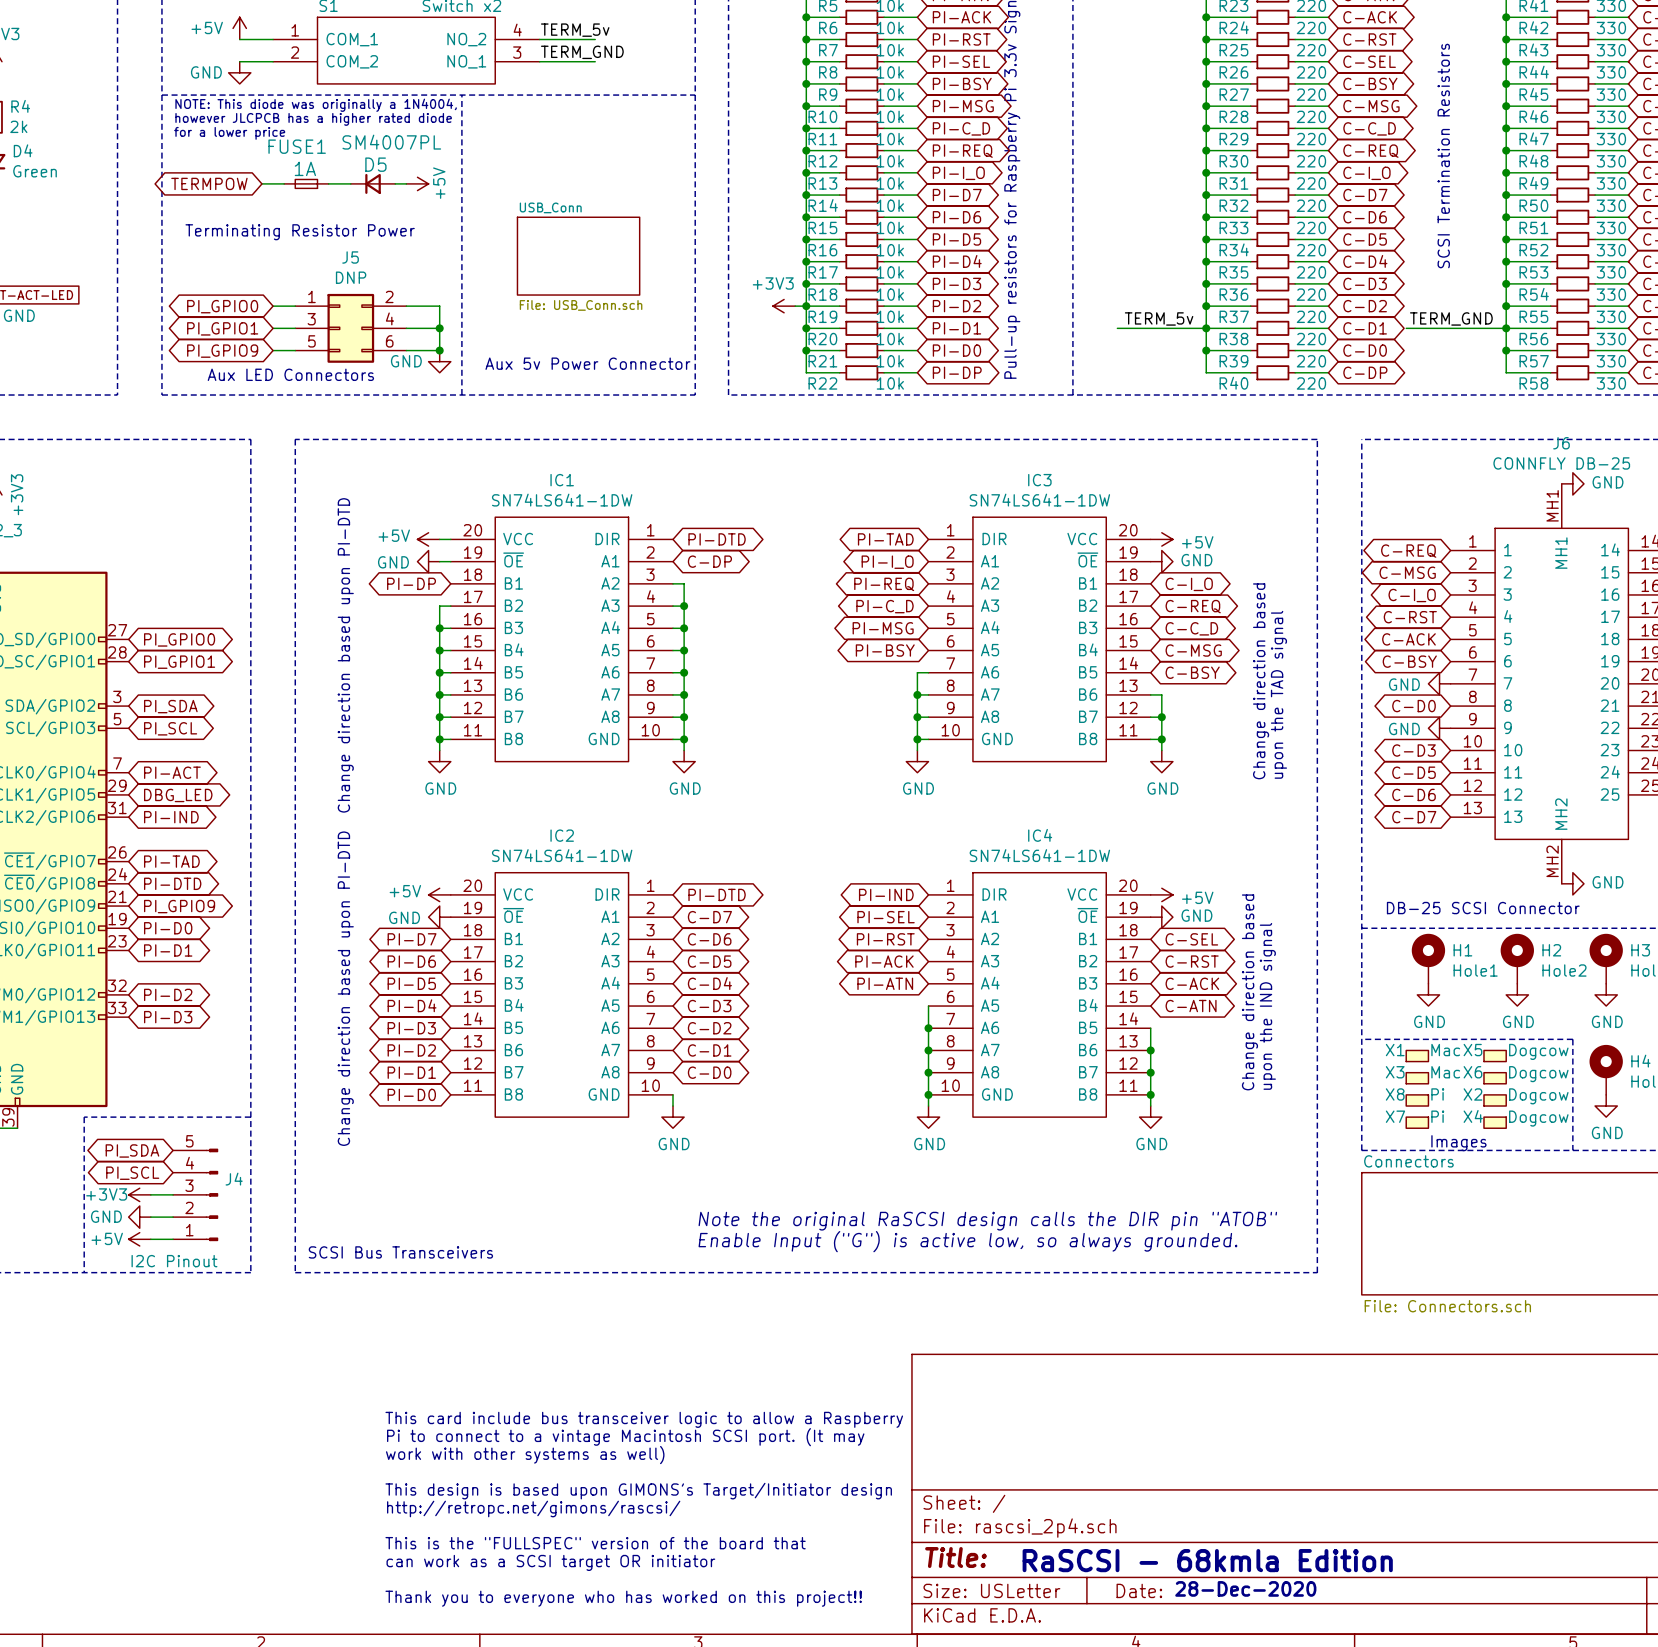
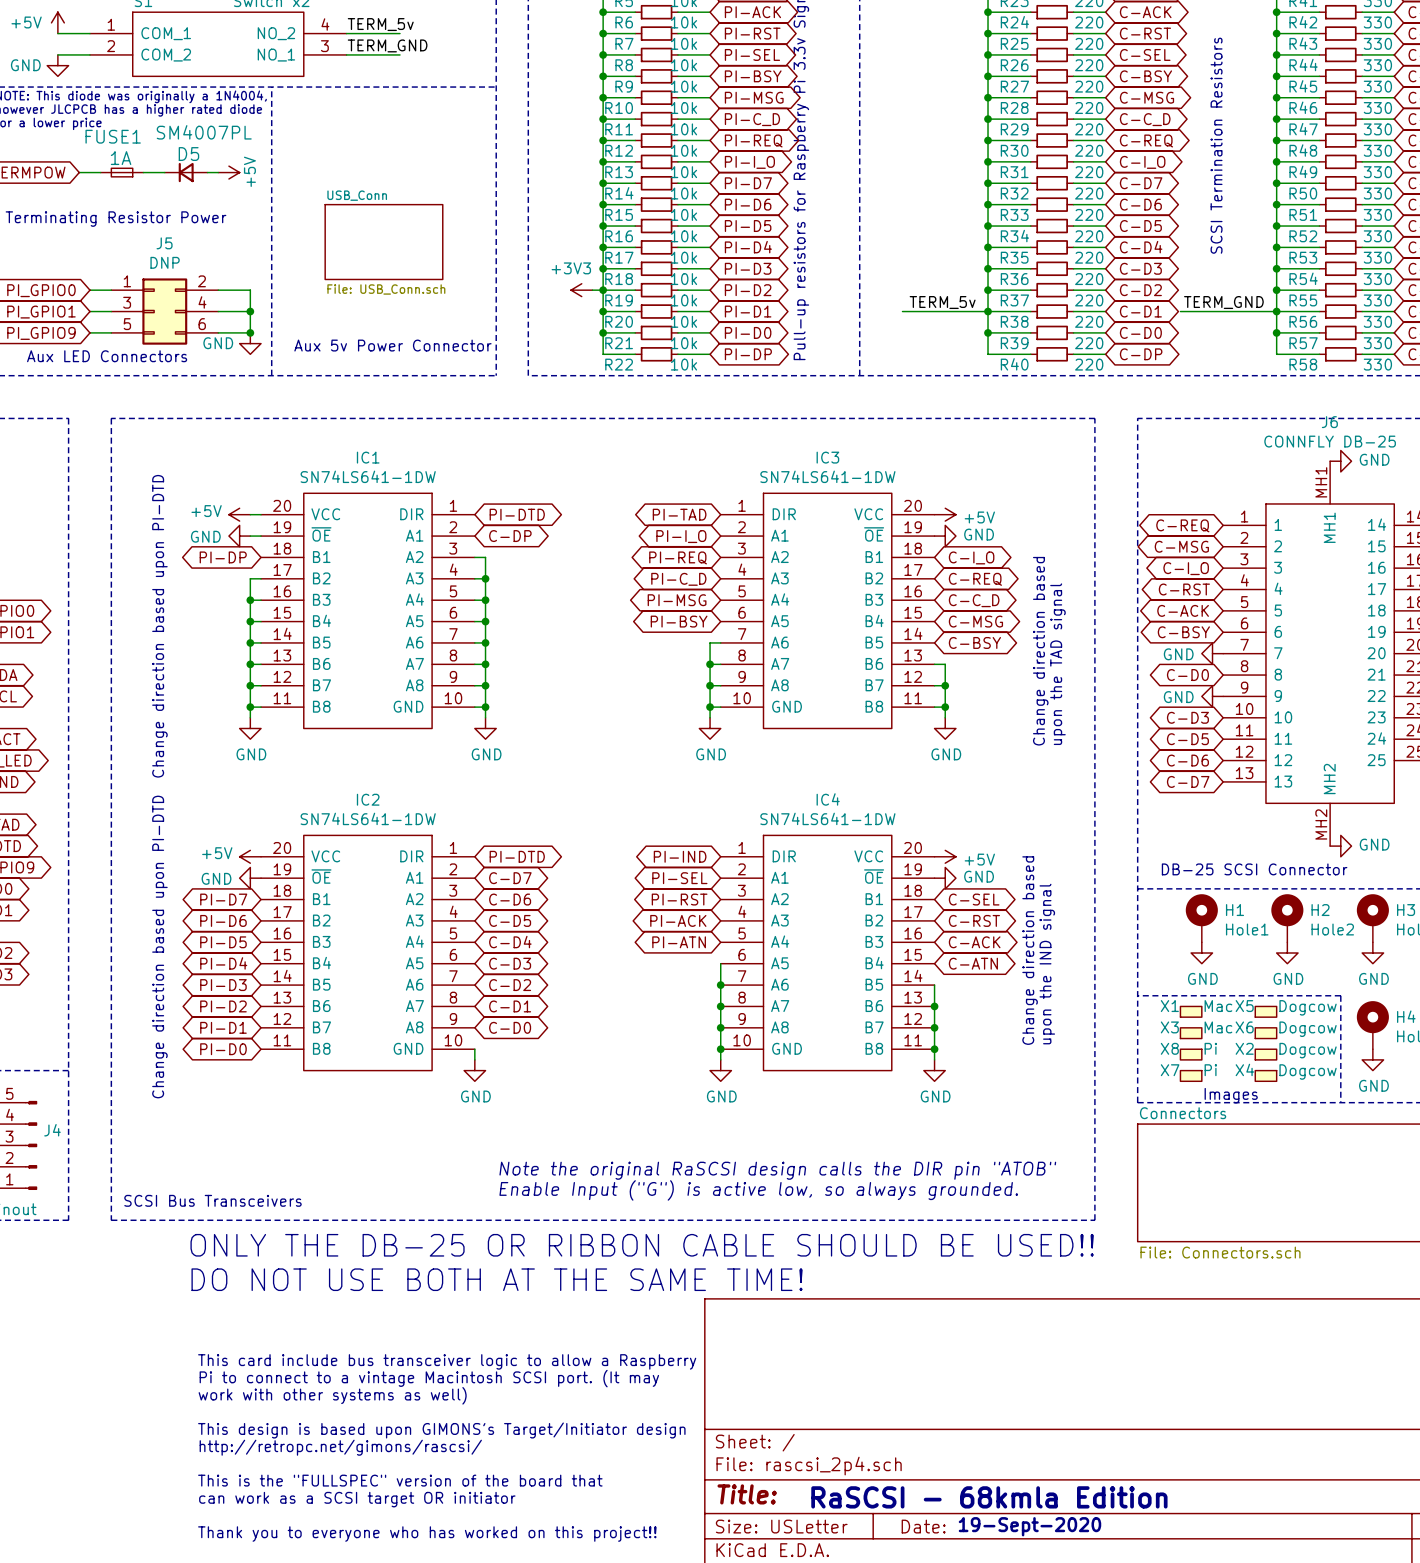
text: none -> ONLY THE DB-25 OR RIBBON CABLE SHOULD BE USED!! (642, 1245)
text: none -> DO NOT USE BOTH AT THE SAME TIME! (497, 1279)
text: 28-Dec-2020 (1245, 1588) -> 19-Sept-2020 (1029, 1526)

